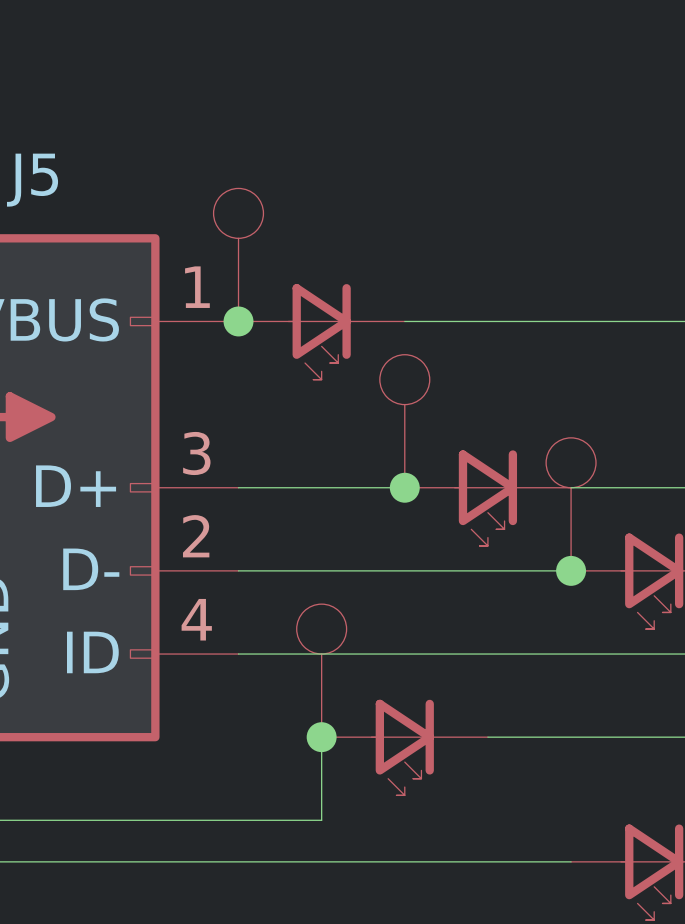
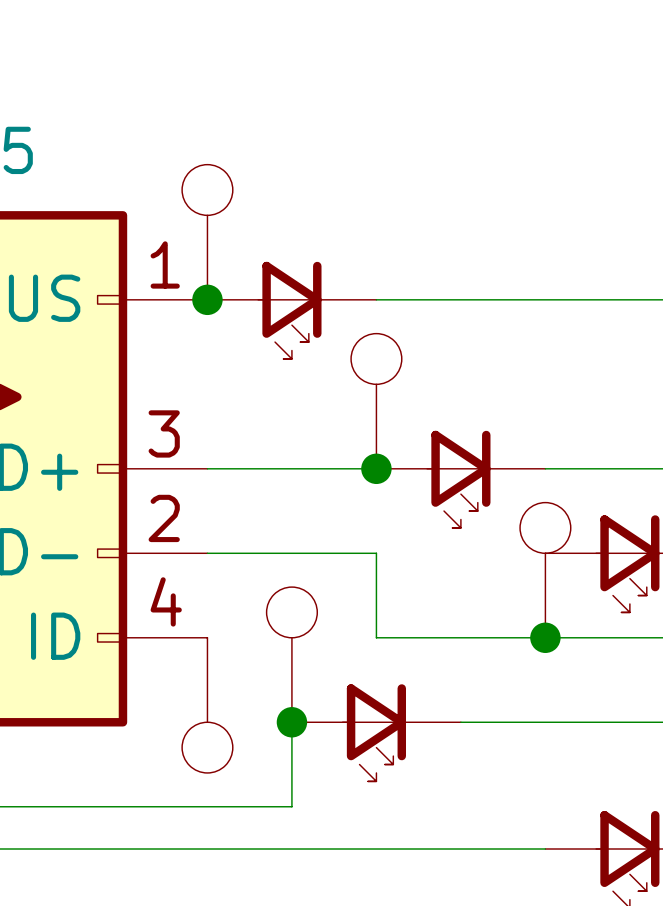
part position: (571, 504) -> (545, 570)
wire: (404, 570) (571, 570) -> none
junction position: (571, 570) -> (545, 637)
wire: (238, 654) (404, 654) -> (376, 553) (376, 637)
part: none -> (207, 705)

